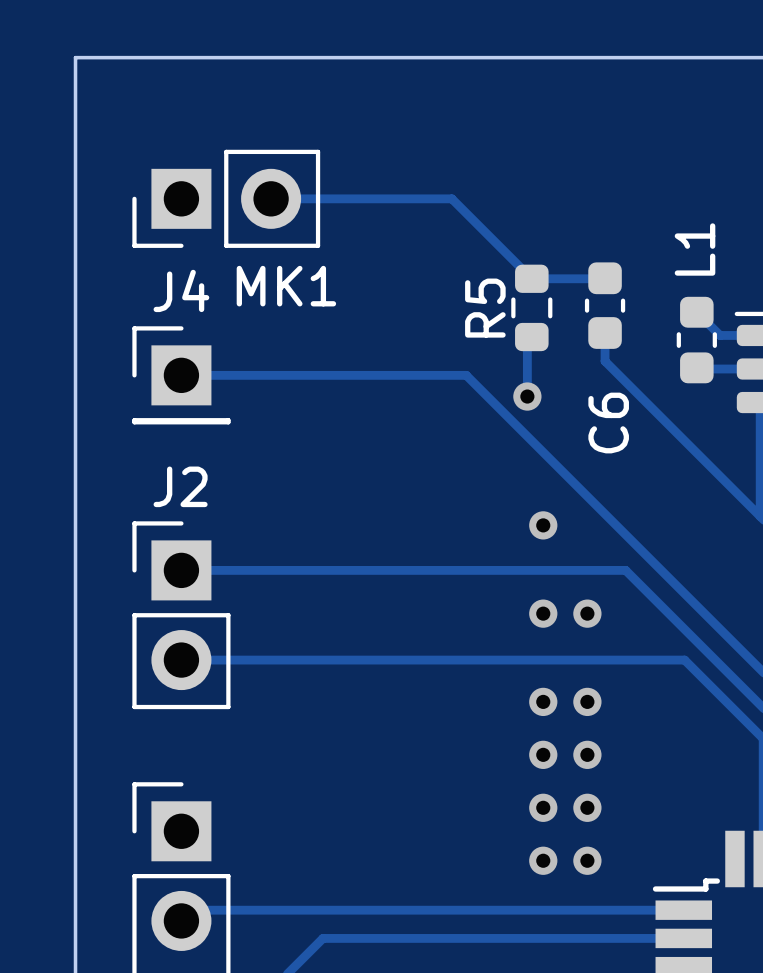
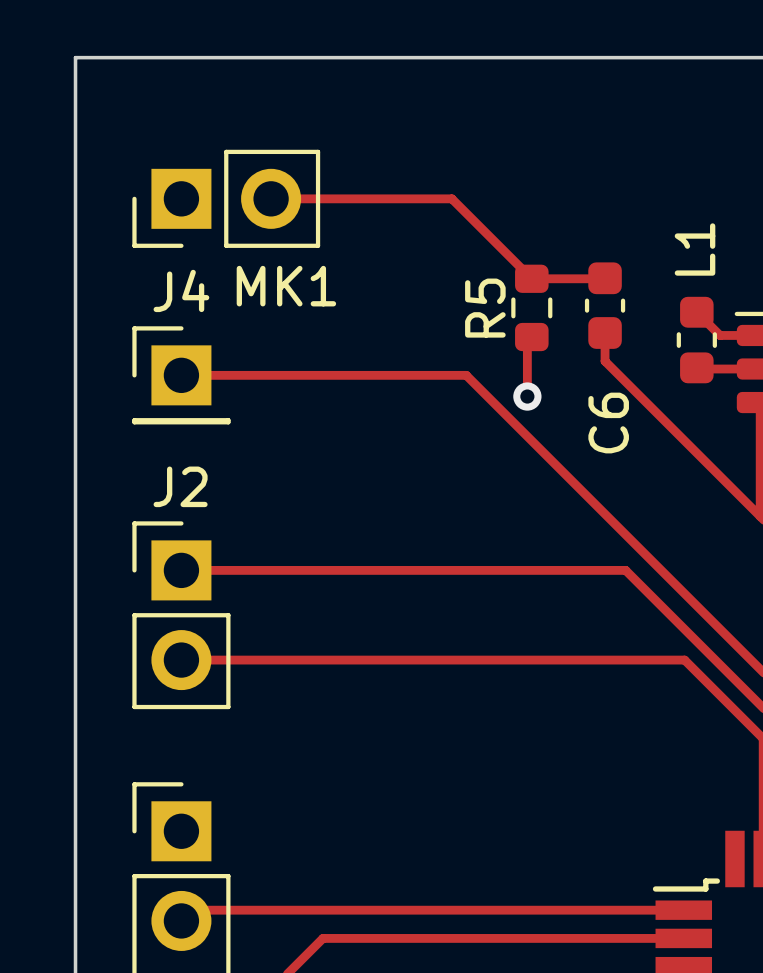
via: (543, 525) -> none
via: (543, 613) -> none
via: (587, 613) -> none
via: (543, 701) -> none
via: (587, 701) -> none
via: (543, 754) -> none
via: (587, 754) -> none
via: (543, 807) -> none
via: (587, 807) -> none
via: (543, 860) -> none
via: (587, 860) -> none

